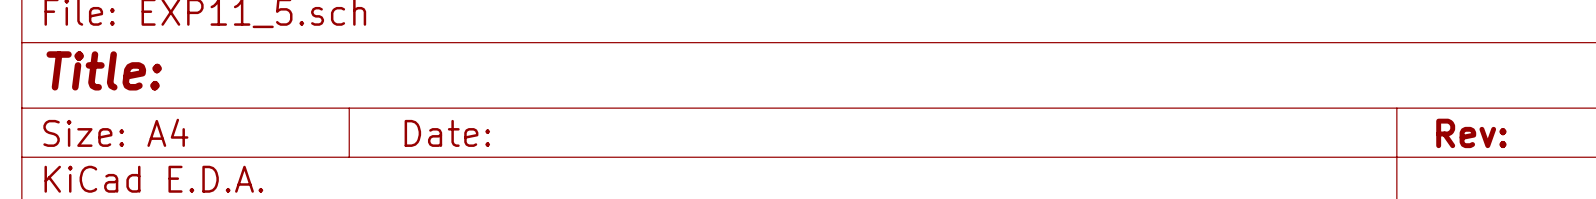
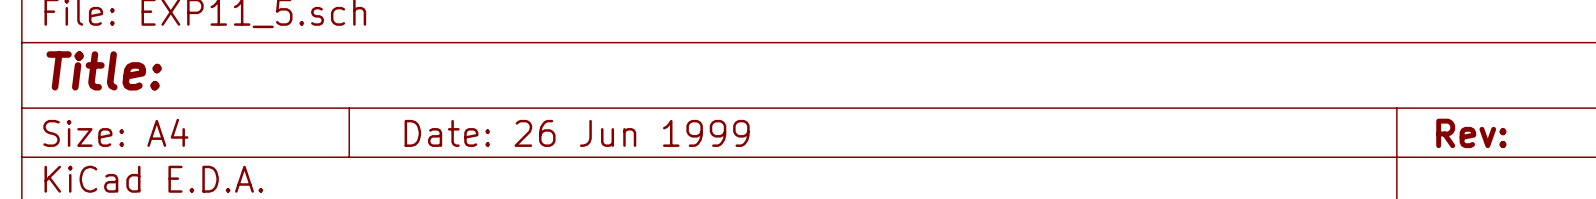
title block: Date: (447, 133) -> Date: 26 Jun 1999 (577, 133)

